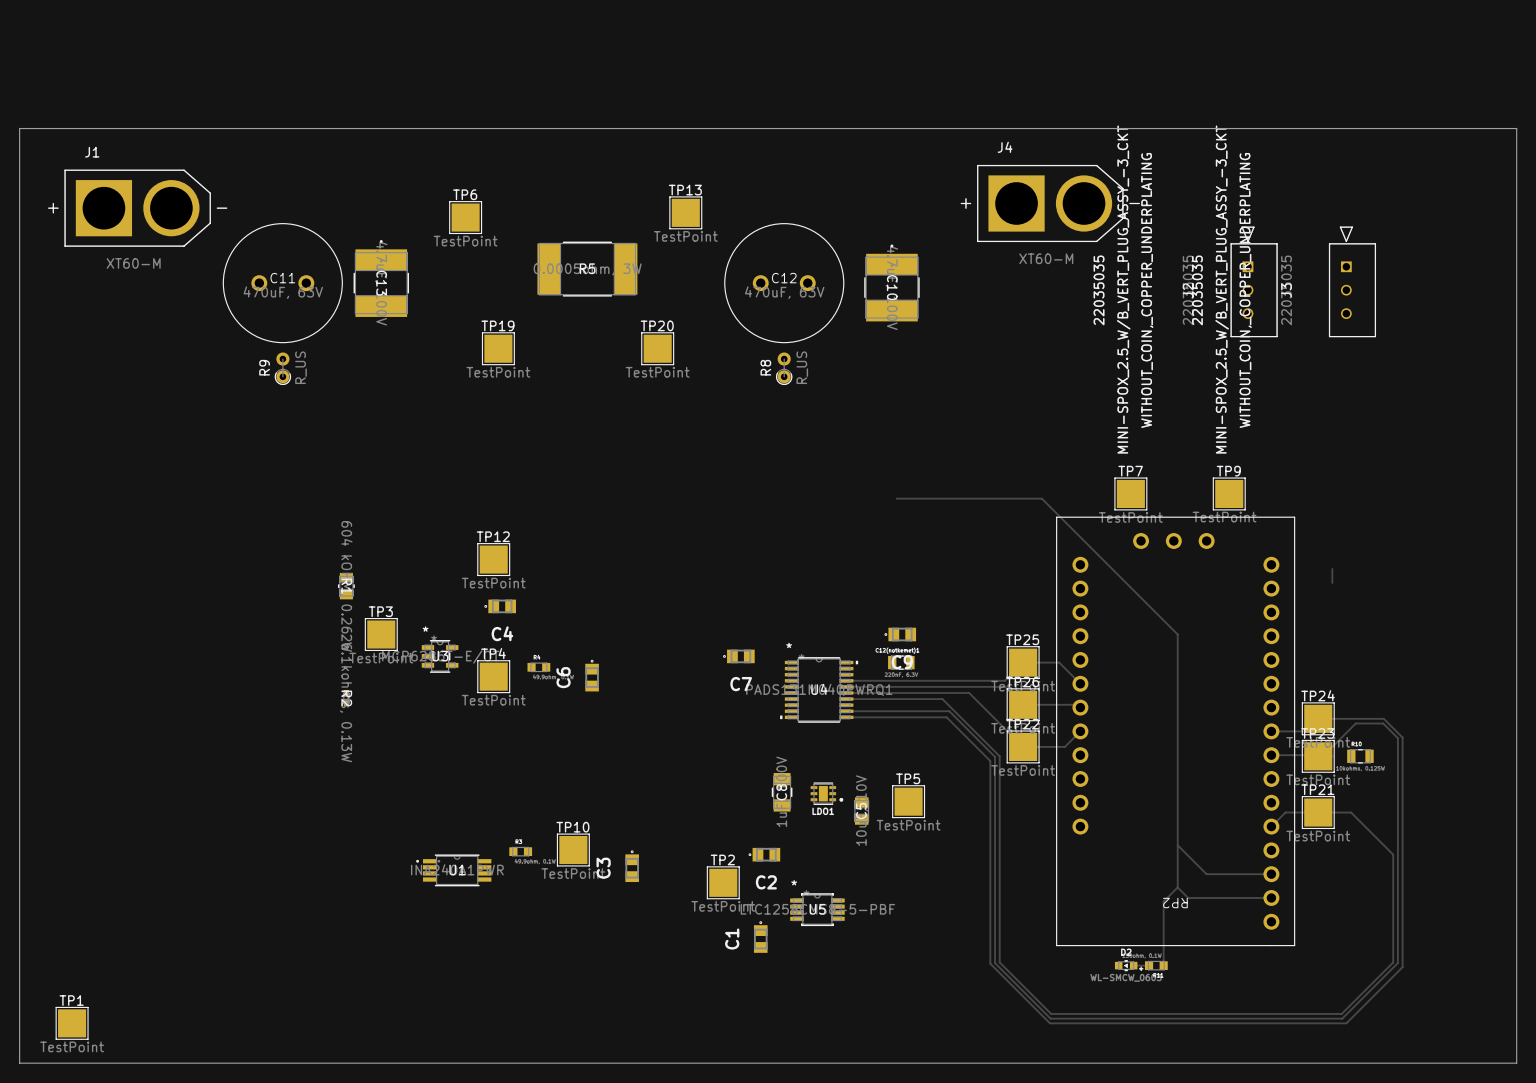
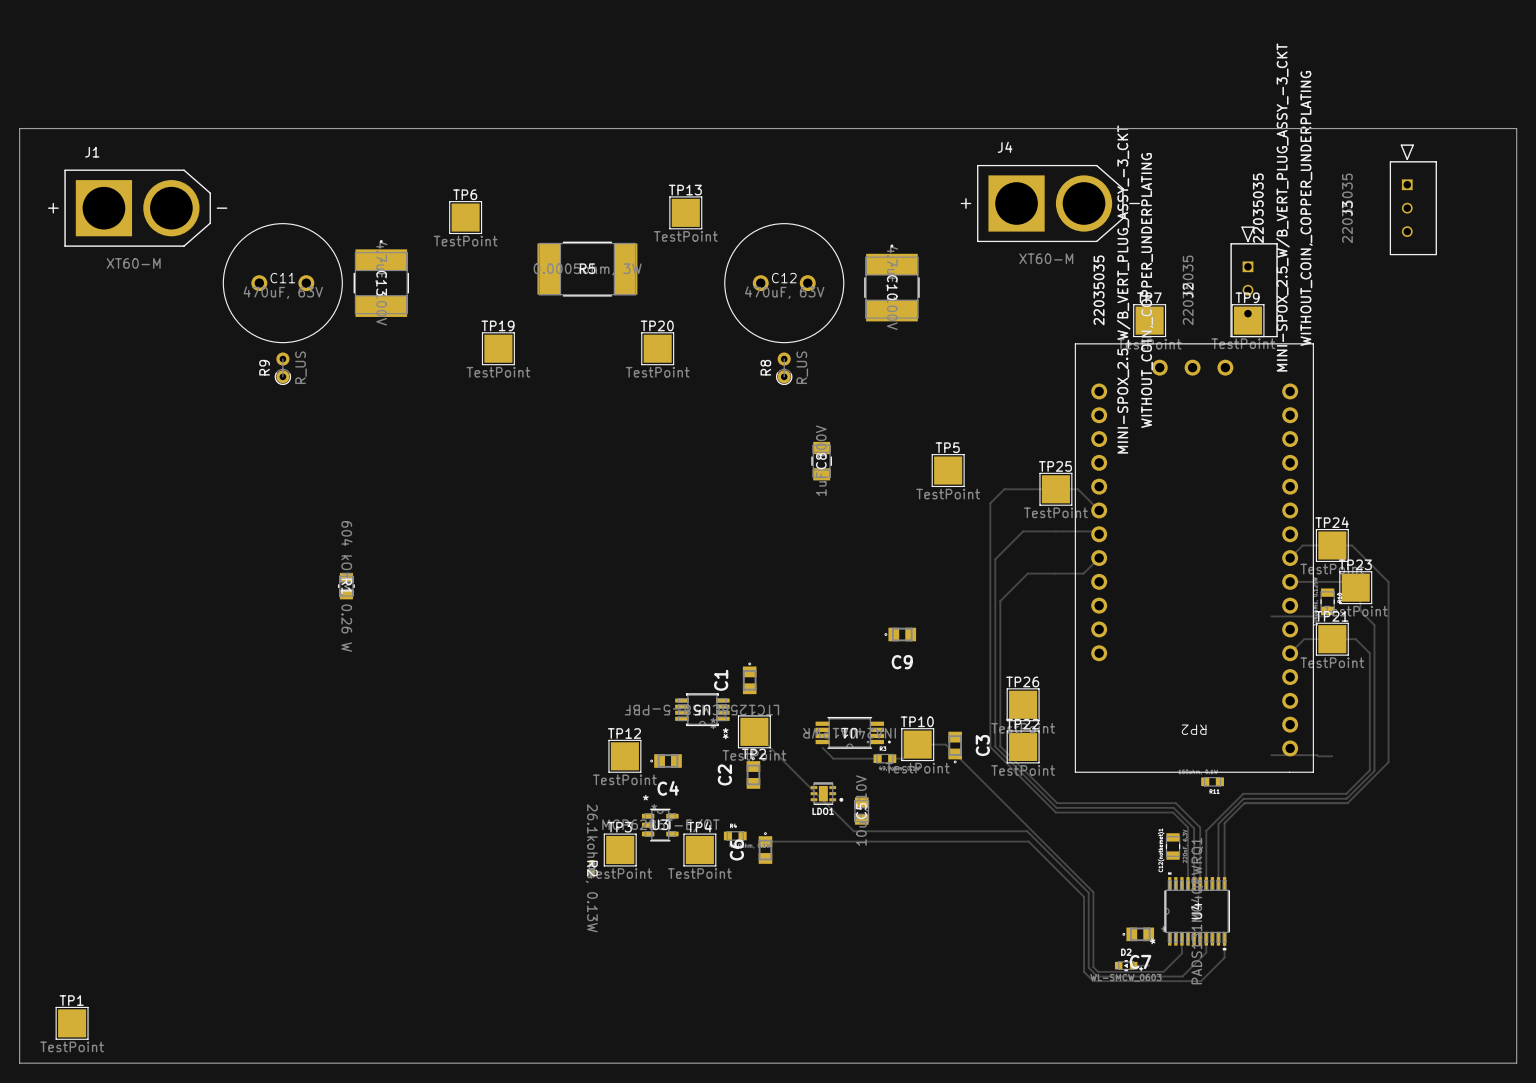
J3 position: (1352, 281) -> (1413, 199)
TP7 position: (1130, 493) -> (1149, 320)
TP9 position: (1229, 493) -> (1247, 320)
track: (896, 498) (1041, 498) (1177, 634) (1177, 887) -> none
track: none -> (1099, 534) (1096, 531) (1023, 531) (995, 559) (995, 746) (1056, 807) (1173, 807) (1194, 828) (1194, 883)
track: none -> (1099, 558) (1083, 573) (1027, 573) (1000, 601) (1000, 746) (1057, 803) (1175, 803) (1200, 827) (1200, 883)
track: none -> (1290, 558) (1302, 545) (1352, 545) (1388, 582) (1388, 762) (1347, 803) (1244, 803) (1224, 823) (1224, 883)
TP12 position: (493, 559) -> (624, 756)
track: (1332, 568) (1332, 582) -> none
track: none -> (1290, 581) (1354, 581) (1360, 587) (1360, 611) (1374, 625) (1374, 770) (1346, 798) (1243, 798) (1218, 823) (1218, 883)
C4 position: (500, 606) -> (666, 761)
track: none -> (1327, 610) (1322, 616) (1271, 616)
TP3 position: (381, 634) -> (620, 850)
track: none -> (1290, 653) (1304, 639) (1355, 639) (1369, 653) (1369, 770) (1346, 793) (1243, 793) (1206, 830) (1206, 883)
U3 position: (440, 656) -> (660, 825)
C7 position: (738, 656) -> (1138, 934)
part rotation: 0° (901, 662) -> 90° clockwise (1173, 846)
part position: (901, 662) -> (1173, 846)
TP25 position: (1023, 662) -> (1055, 489)
part position: (538, 667) -> (735, 835)
C6 position: (592, 675) -> (765, 848)
TP4 position: (493, 676) -> (699, 850)
track: (846, 680) (1004, 680) (1023, 662) (1059, 662) (1080, 683) -> none
track: (846, 686) (1005, 686) (1023, 704) (1077, 704) (1080, 707) -> none
U4 rotation: 0° (819, 689) -> 90° counterclockwise (1197, 911)
U4 position: (819, 689) -> (1197, 911)
track: (846, 692) (969, 692) (1023, 746) (1064, 746) (1080, 731) -> none
R2 position: (346, 698) -> (592, 868)
track: (846, 699) (942, 699) (990, 746) -> (1099, 510) (1077, 489) (1004, 489) (990, 503) (990, 746)
track: (846, 711) (949, 711) (995, 756) (995, 963) (1050, 1018) (1342, 1018) (1397, 963) (1397, 738) (1383, 723) (1355, 723) (1322, 756) -> none
track: (846, 717) (946, 717) (990, 761) (990, 963) (1050, 1023) (1346, 1023) (1402, 967) (1402, 737) (1383, 718) (1318, 718) (1305, 731) (1271, 731) -> none
TP24 position: (1318, 718) -> (1332, 545)
track: none -> (754, 731) (853, 831) (1027, 831) (1088, 892) (1088, 967) (1098, 976) (1182, 976) (1206, 952) (1206, 939)
RP2 position: (1175, 731) -> (1194, 558)
track: none -> (822, 747) (833, 758) (877, 758) (874, 761)
track: (999, 756) (999, 962) (1051, 1013) (1341, 1013) (1393, 962) (1393, 854) (1351, 812) (1285, 812) (1271, 826) -> (999, 756) (1055, 812) (1173, 812) (1188, 827) (1188, 883)
TP23 position: (1318, 756) -> (1355, 587)
part rotation: 0° (1360, 756) -> 90° clockwise (1327, 601)
part position: (1360, 756) -> (1327, 601)
track: none -> (892, 758) (903, 758) (917, 744) (945, 744) (1093, 892) (1093, 967) (1098, 971) (1163, 971) (1181, 953) (1181, 939)
C8 position: (782, 792) -> (821, 461)
TP5 position: (908, 801) -> (948, 470)
TP21 position: (1318, 812) -> (1332, 639)
track: none -> (765, 841) (1028, 841) (1084, 896) (1084, 971) (1093, 981) (1201, 981) (1224, 957) (1224, 939)
track: (1177, 845) (1206, 874) (1271, 874) -> none
TP10 position: (573, 850) -> (917, 744)
part position: (520, 851) -> (884, 758)
C2 rotation: 0° (764, 854) -> 90° clockwise (753, 772)
C2 position: (764, 854) -> (753, 772)
TP2 name position: TP2 (722, 859) -> TP2 (753, 753)
C3 rotation: 0° (632, 866) -> 180° (955, 747)
C3 position: (632, 866) -> (955, 747)
U1 rotation: 0° (453, 870) -> 180° (853, 732)
U1 position: (453, 870) -> (853, 732)
TP2 position: (723, 882) -> (754, 731)
track: (1177, 887) (1188, 897) (1271, 897) -> none
track: (1177, 887) (1163, 901) (1163, 965) -> none
U5 footprint: [790, 893, 845, 927] -> [675, 693, 730, 727]
C1 position: (760, 937) -> (749, 678)
part position: (1156, 965) -> (1212, 781)

